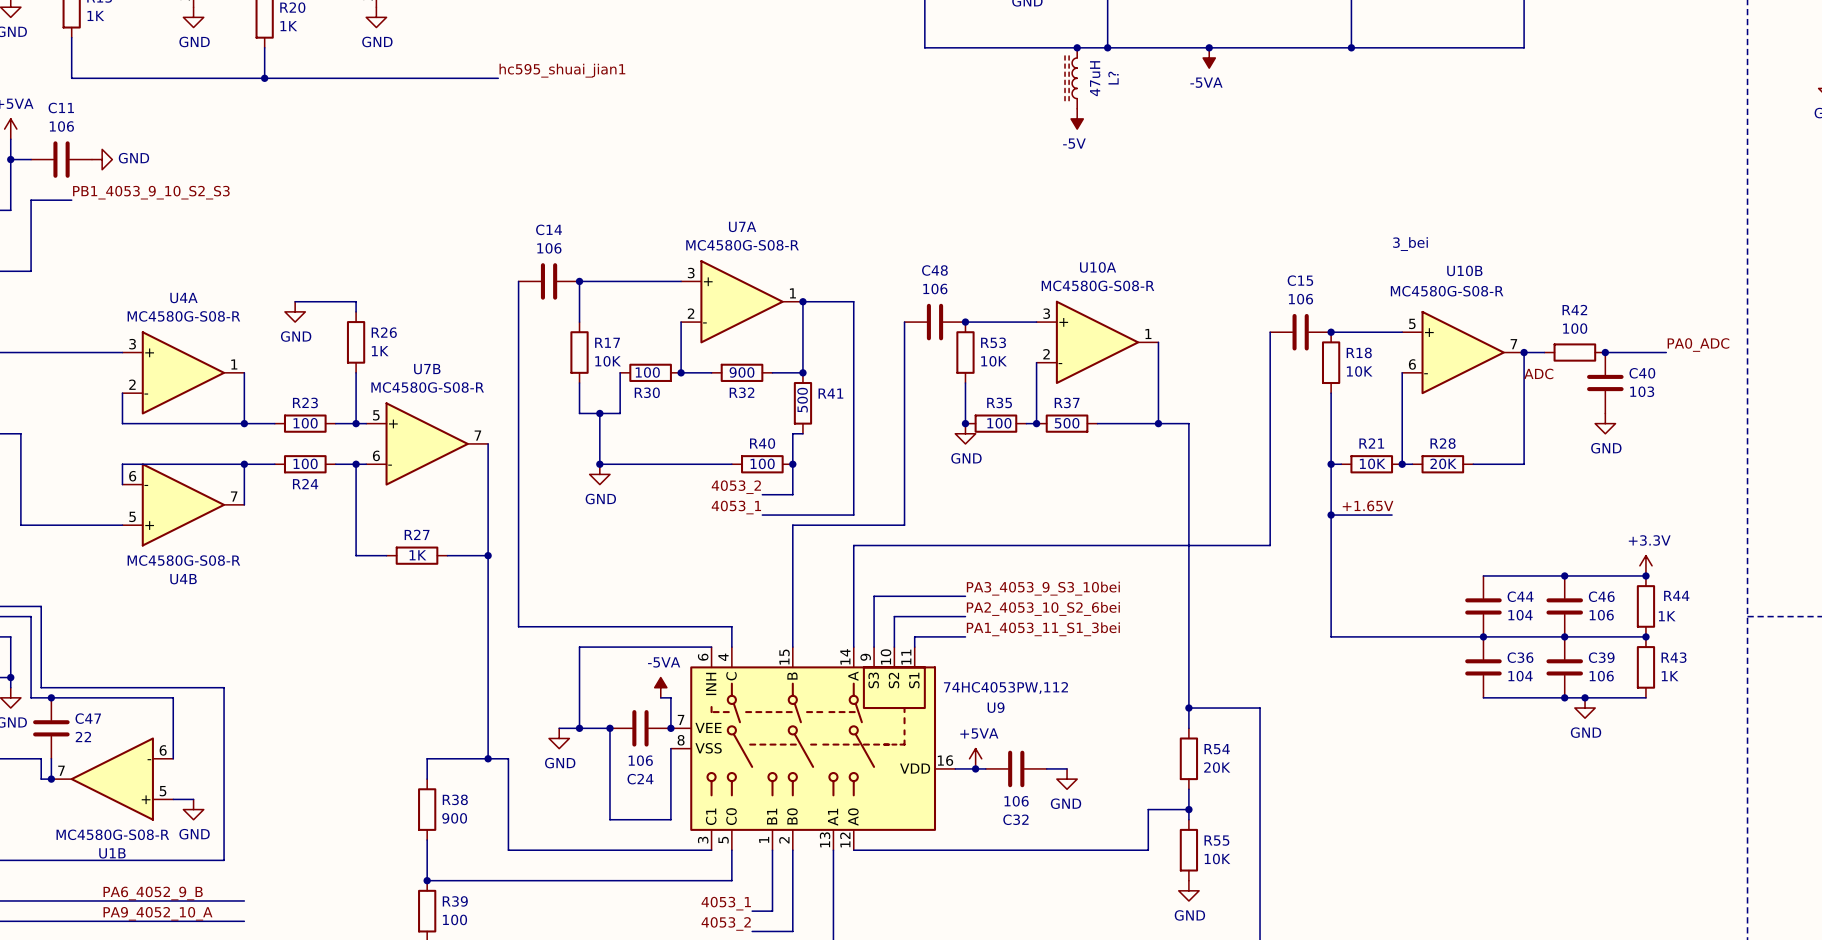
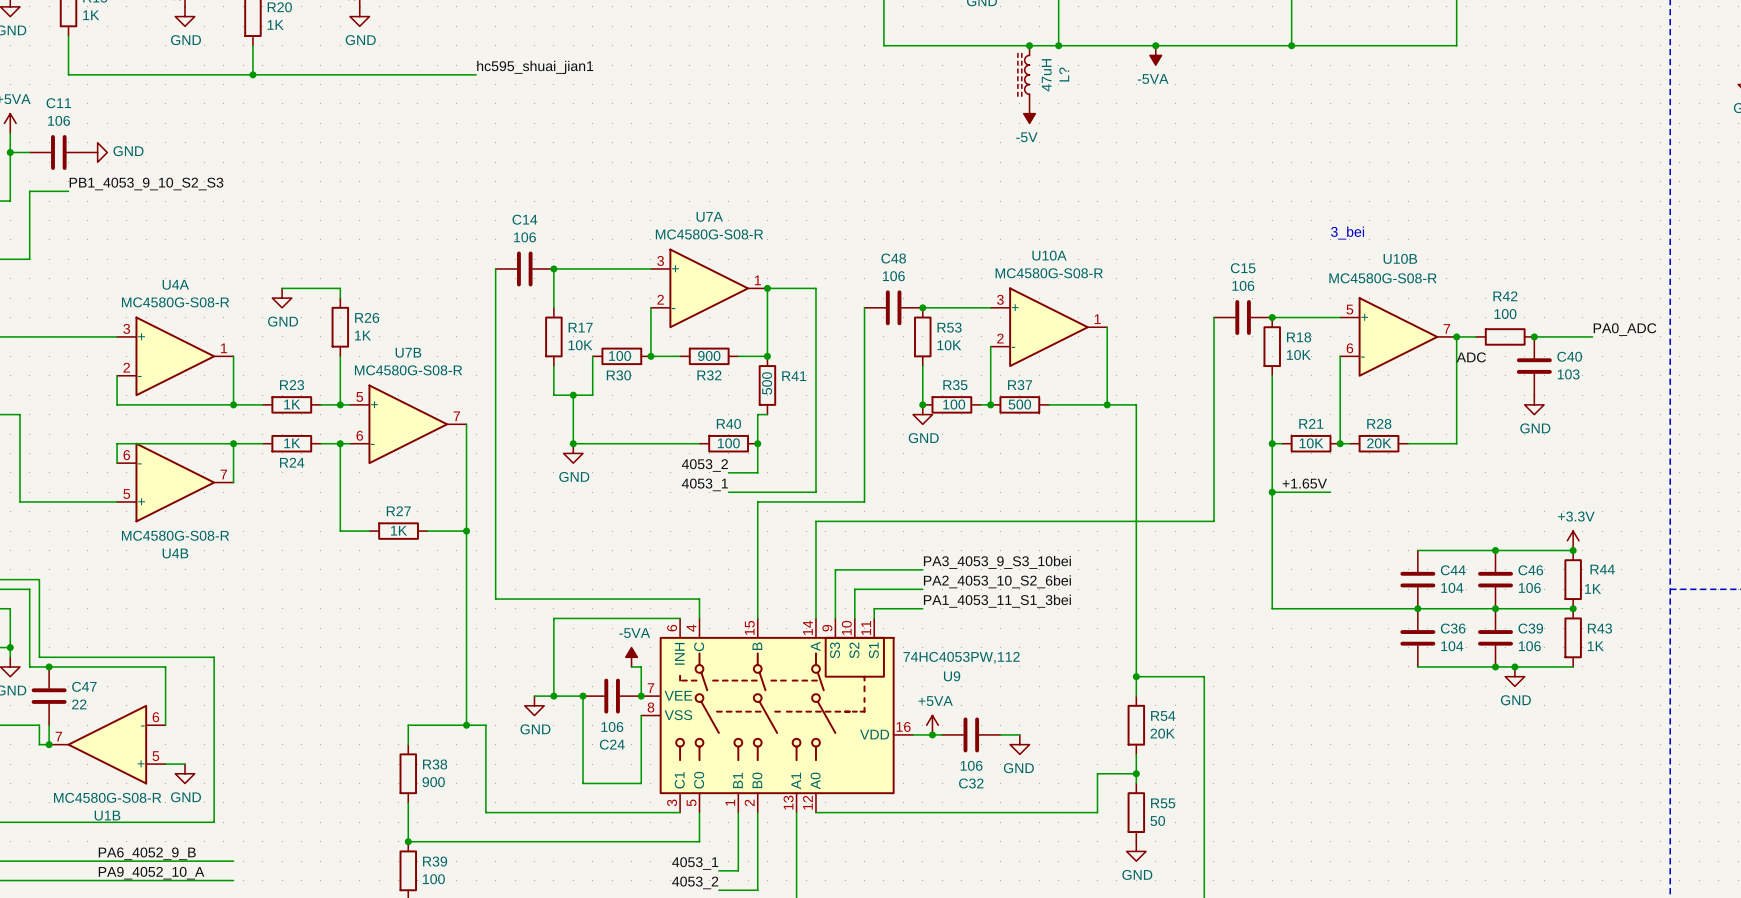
R23 value: 100 (305, 423) -> 1K (292, 404)
R24 value: 100 (305, 463) -> 1K (292, 443)
R55 value: 10K (1217, 858) -> 50 (1157, 820)

